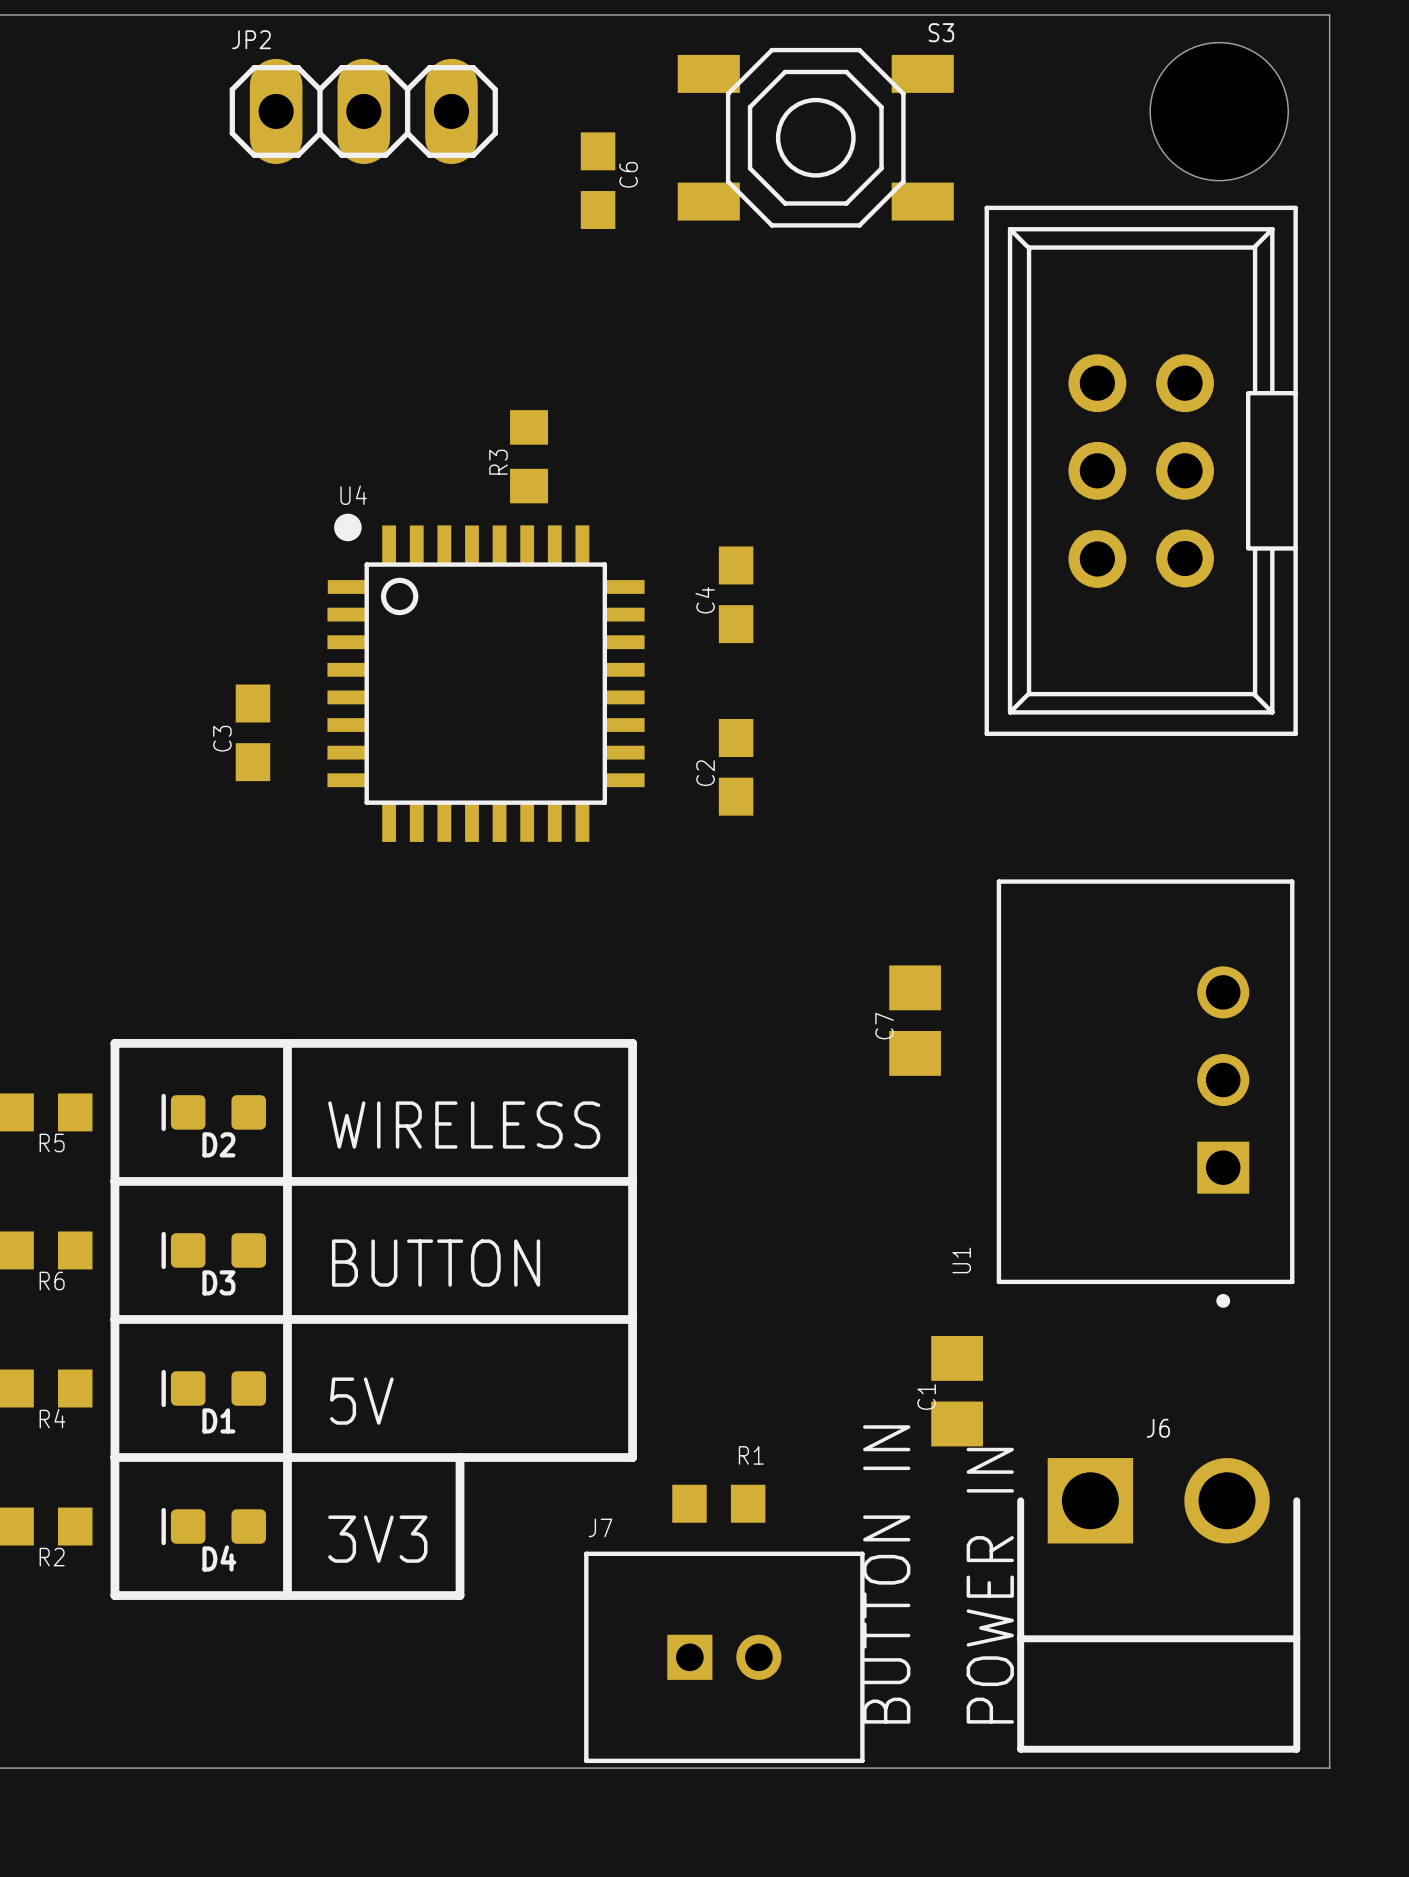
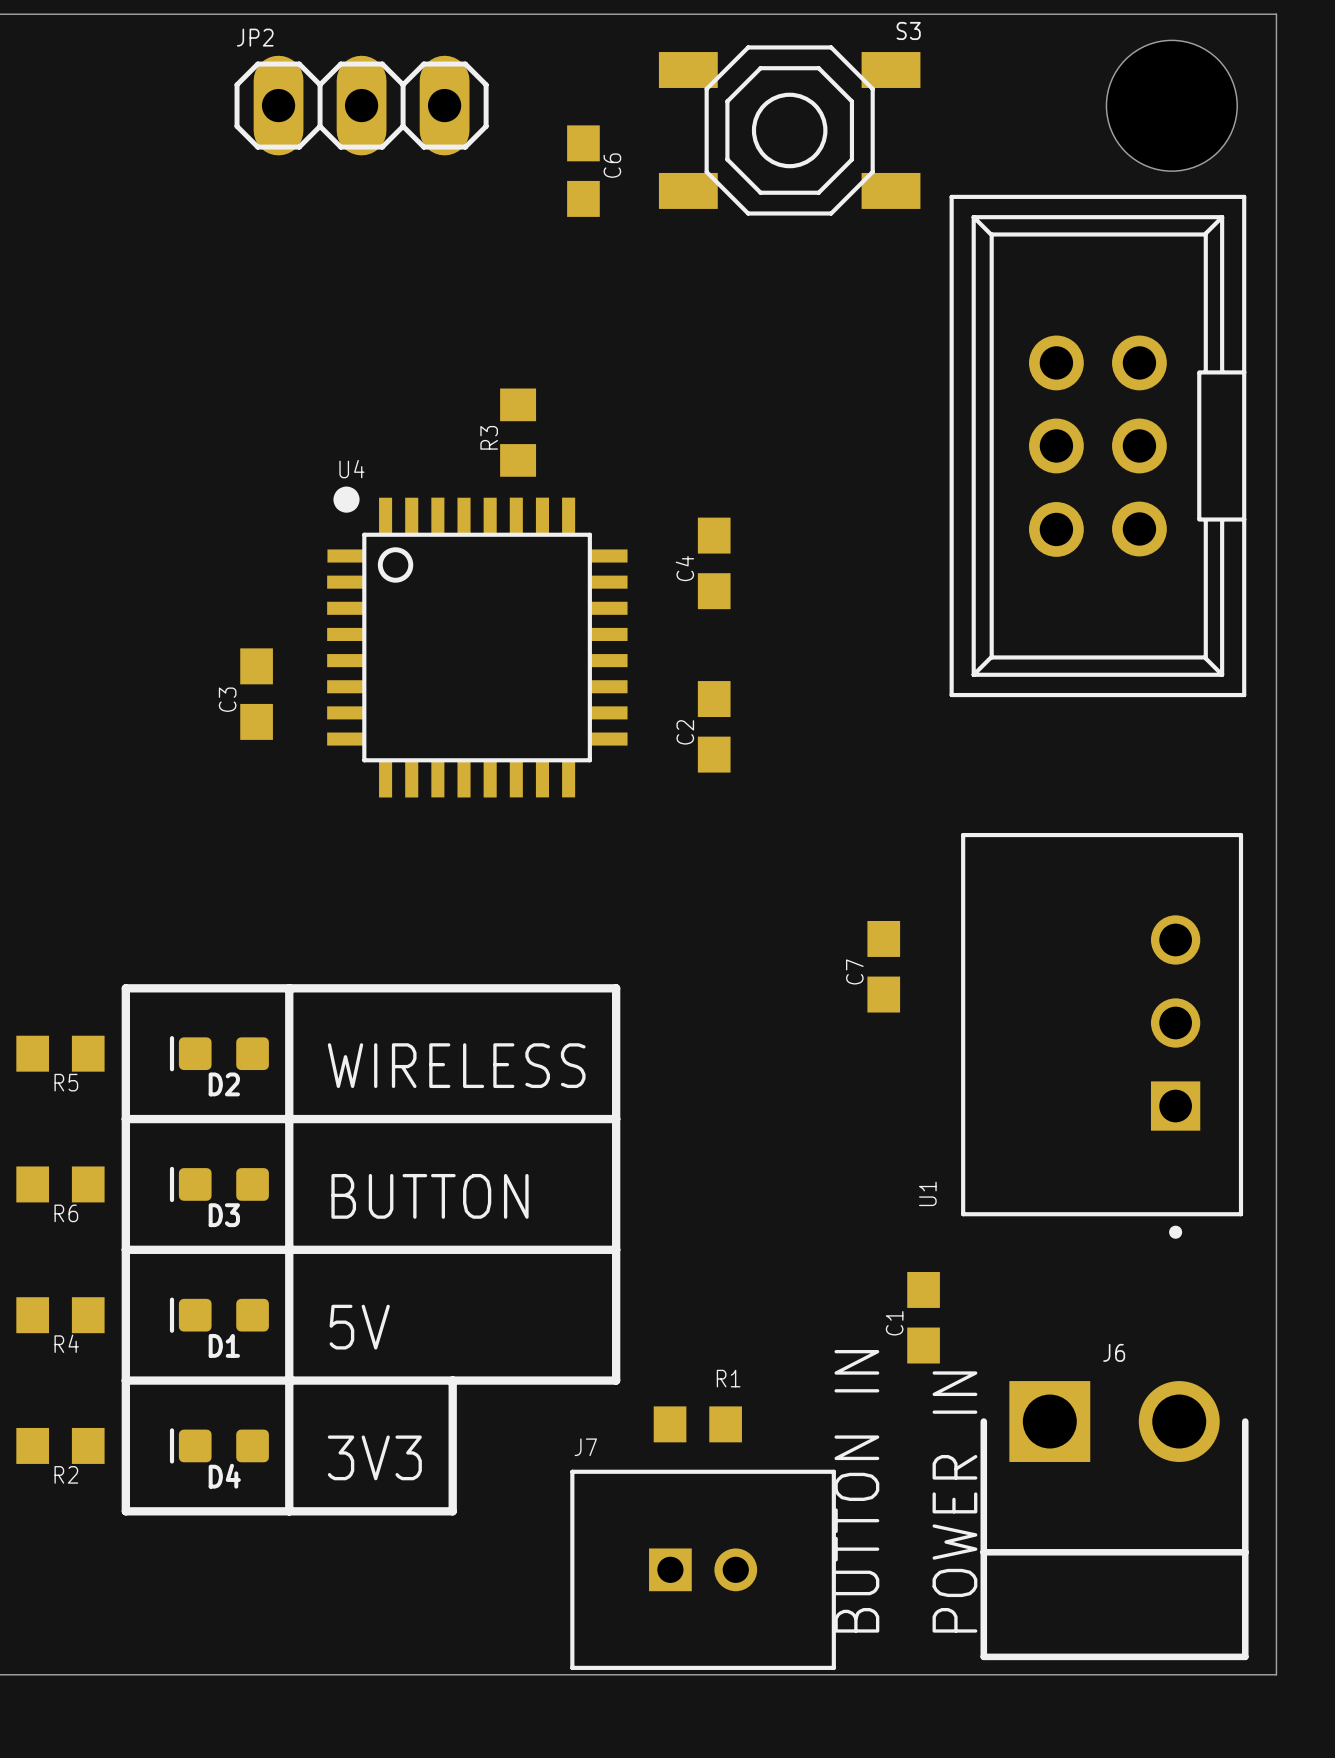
C7 footprint: [889, 965, 941, 1076] -> [867, 920, 901, 1013]
C1 footprint: [931, 1335, 984, 1447] -> [907, 1271, 940, 1364]

